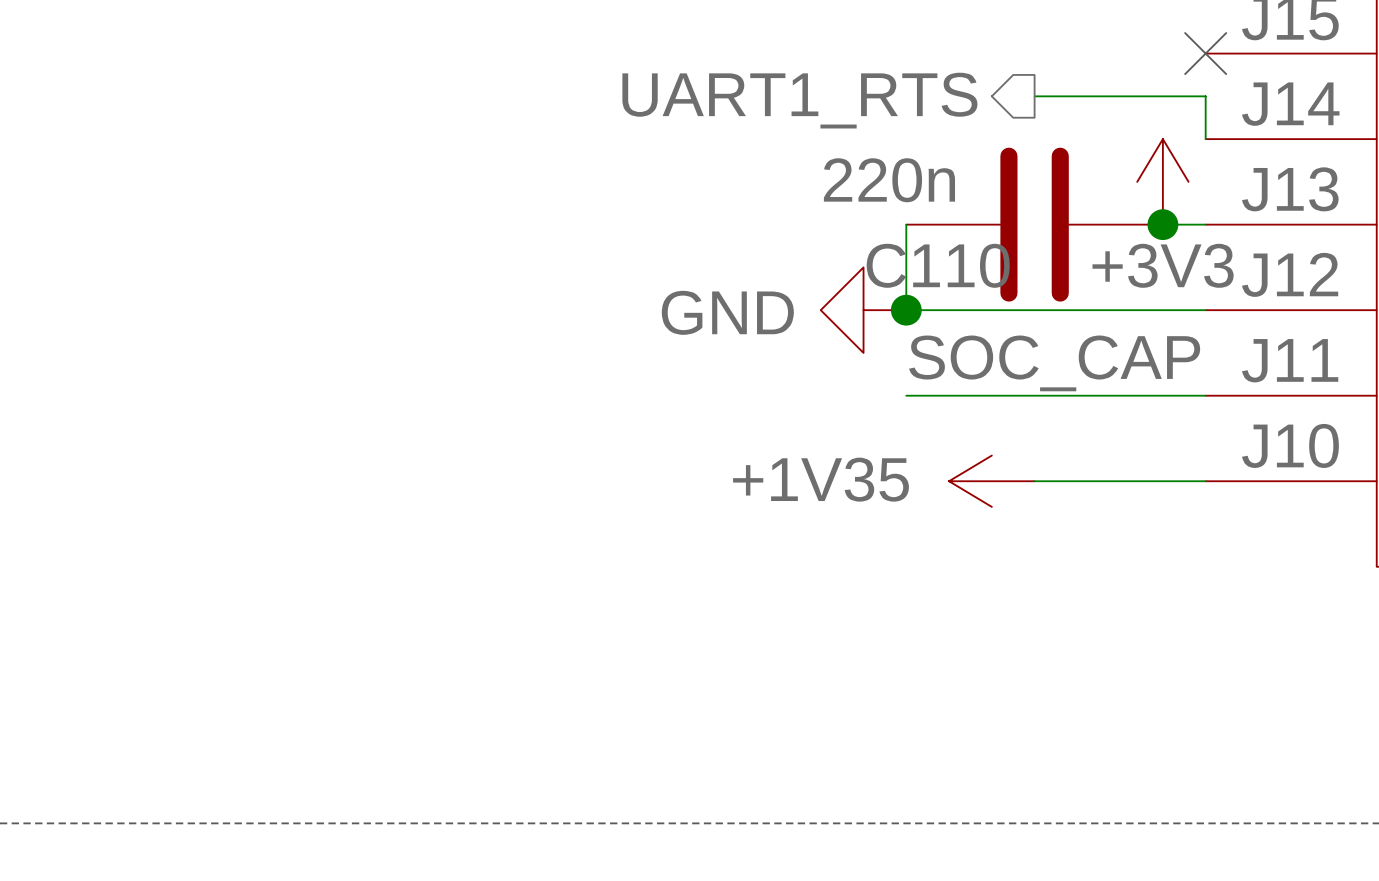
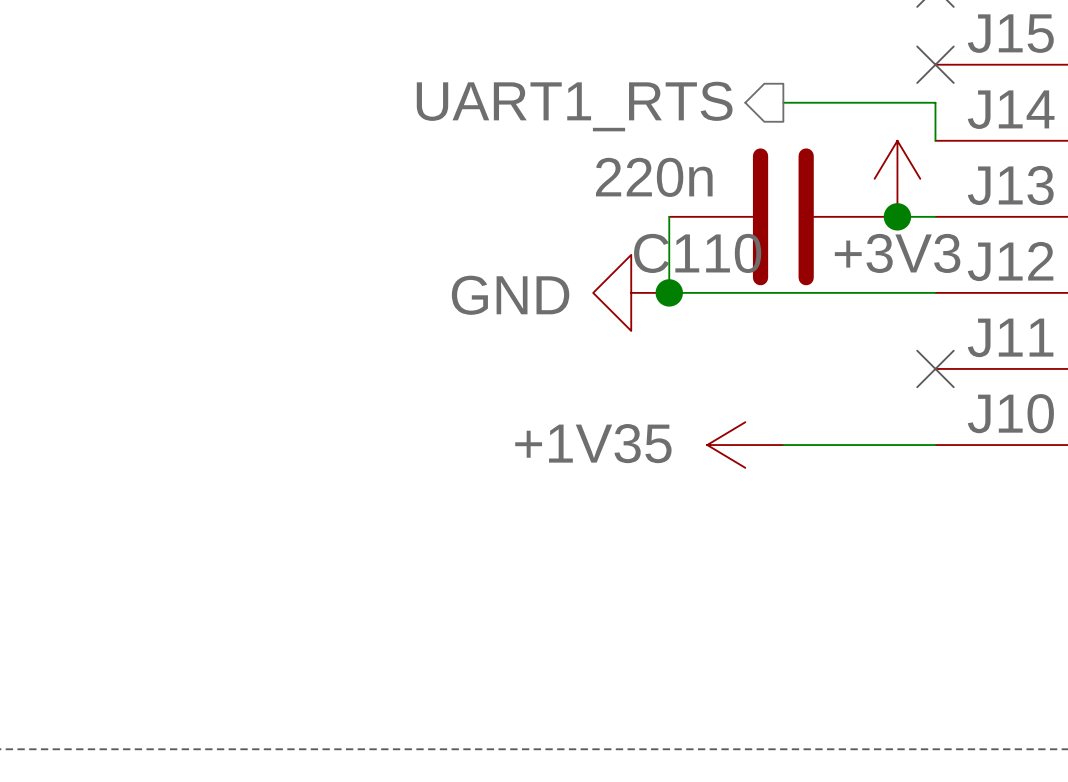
label: SOC_CAP (1054, 363) -> none
wire: (906, 395) (1205, 395) -> none
no-connect mark: none -> (935, 368)

